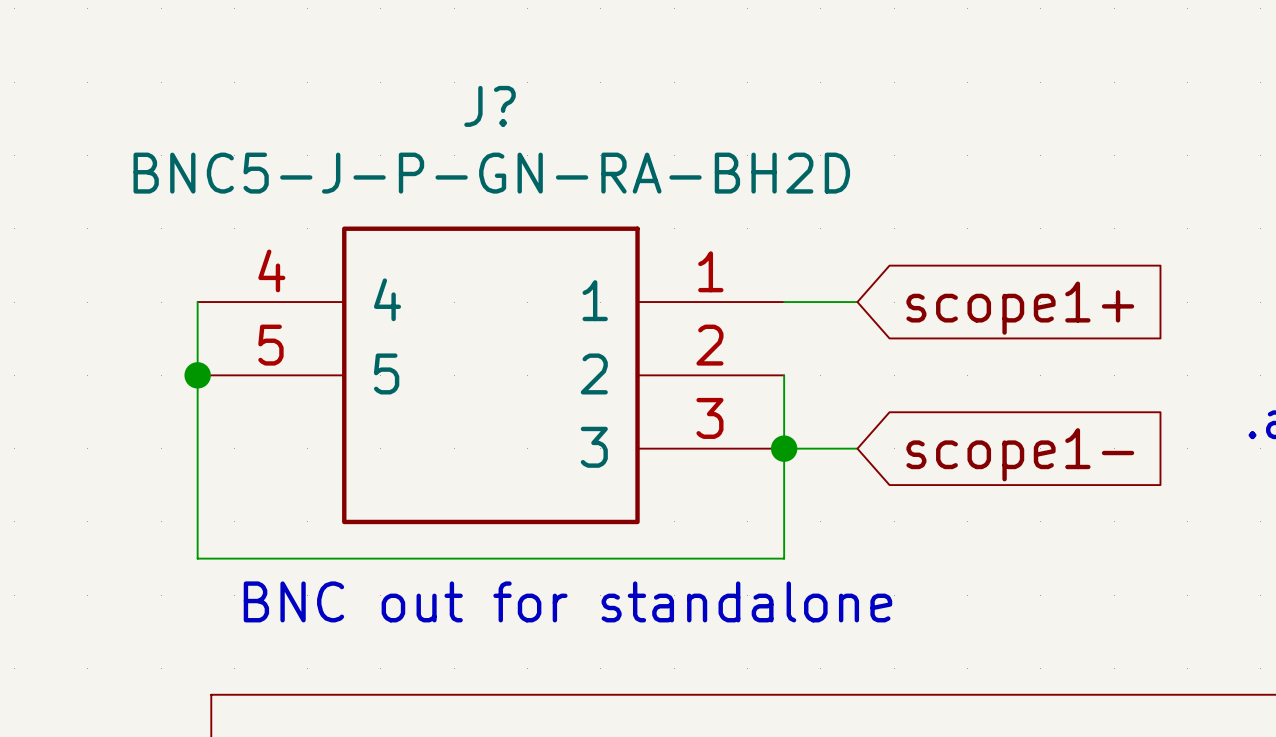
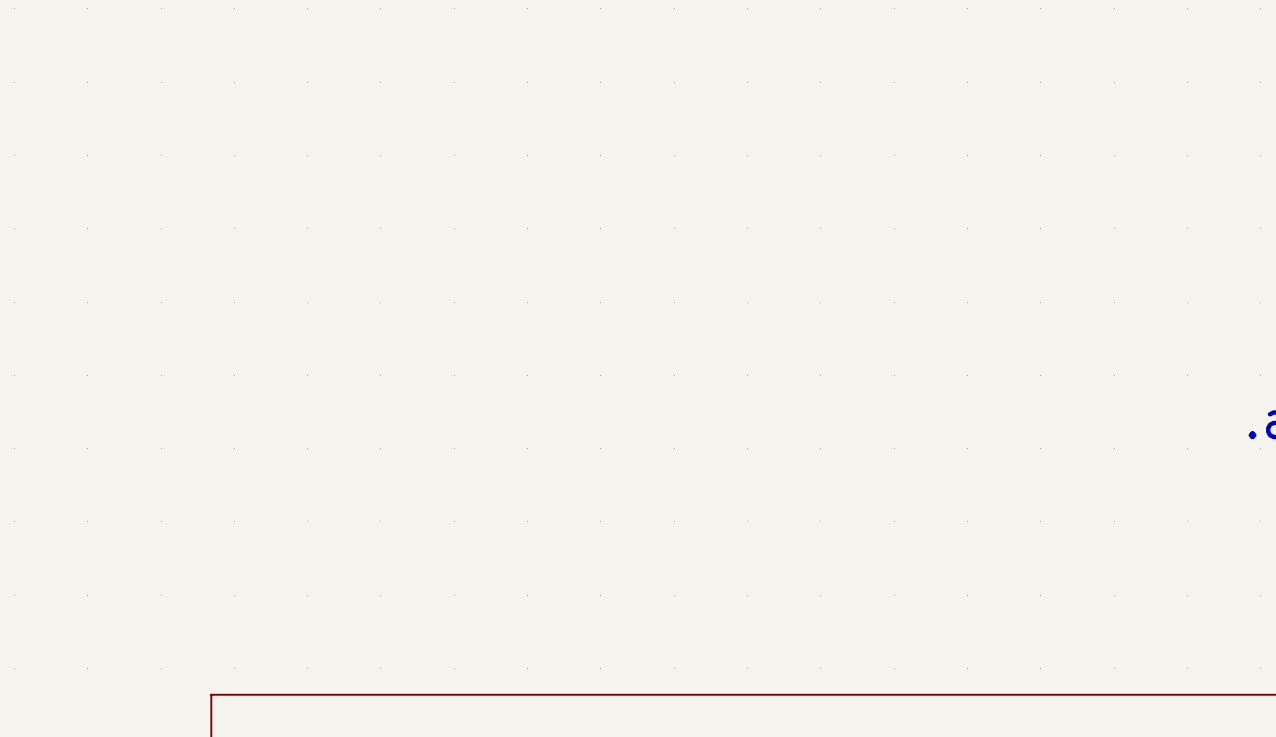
wire: (197, 302) (197, 558) (784, 558) (784, 375) -> none
wire: (784, 302) (857, 302) -> none
global label: scope1+ (1020, 308) -> none
junction: (197, 375) -> none
J?: BNC5-J-P-GN-RA-BH2D (490, 375) -> none
wire: (784, 448) (857, 448) -> none
junction: (784, 448) -> none
global label: scope1- (1020, 454) -> none
text: BNC out for standalone (567, 601) -> none

